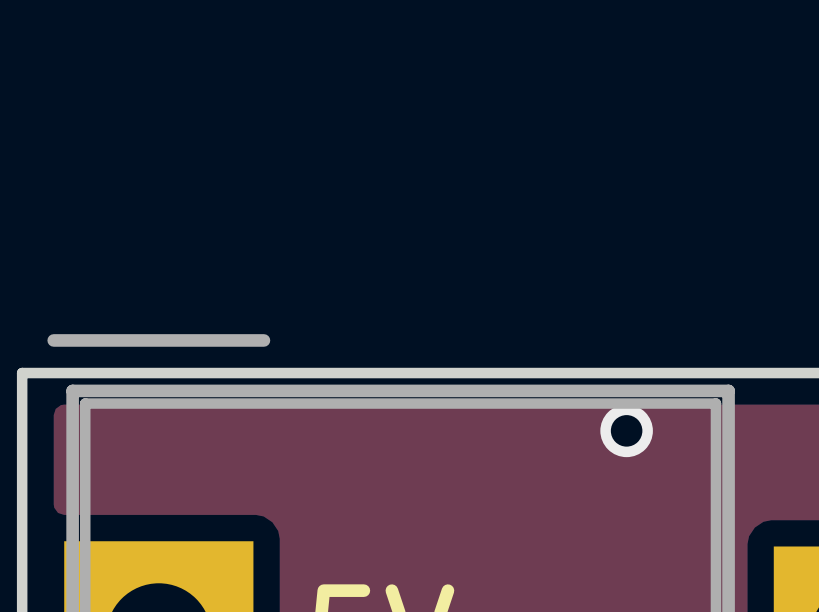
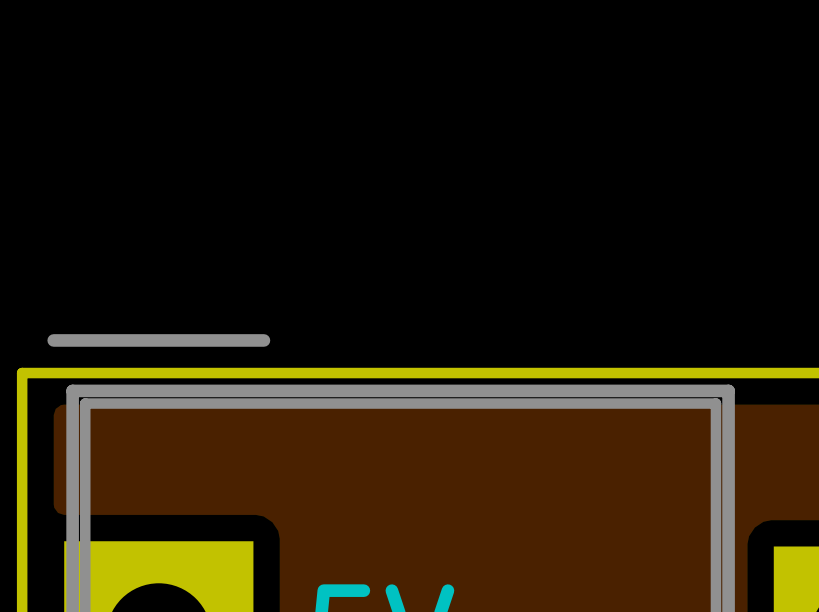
via: (626, 430) -> none

